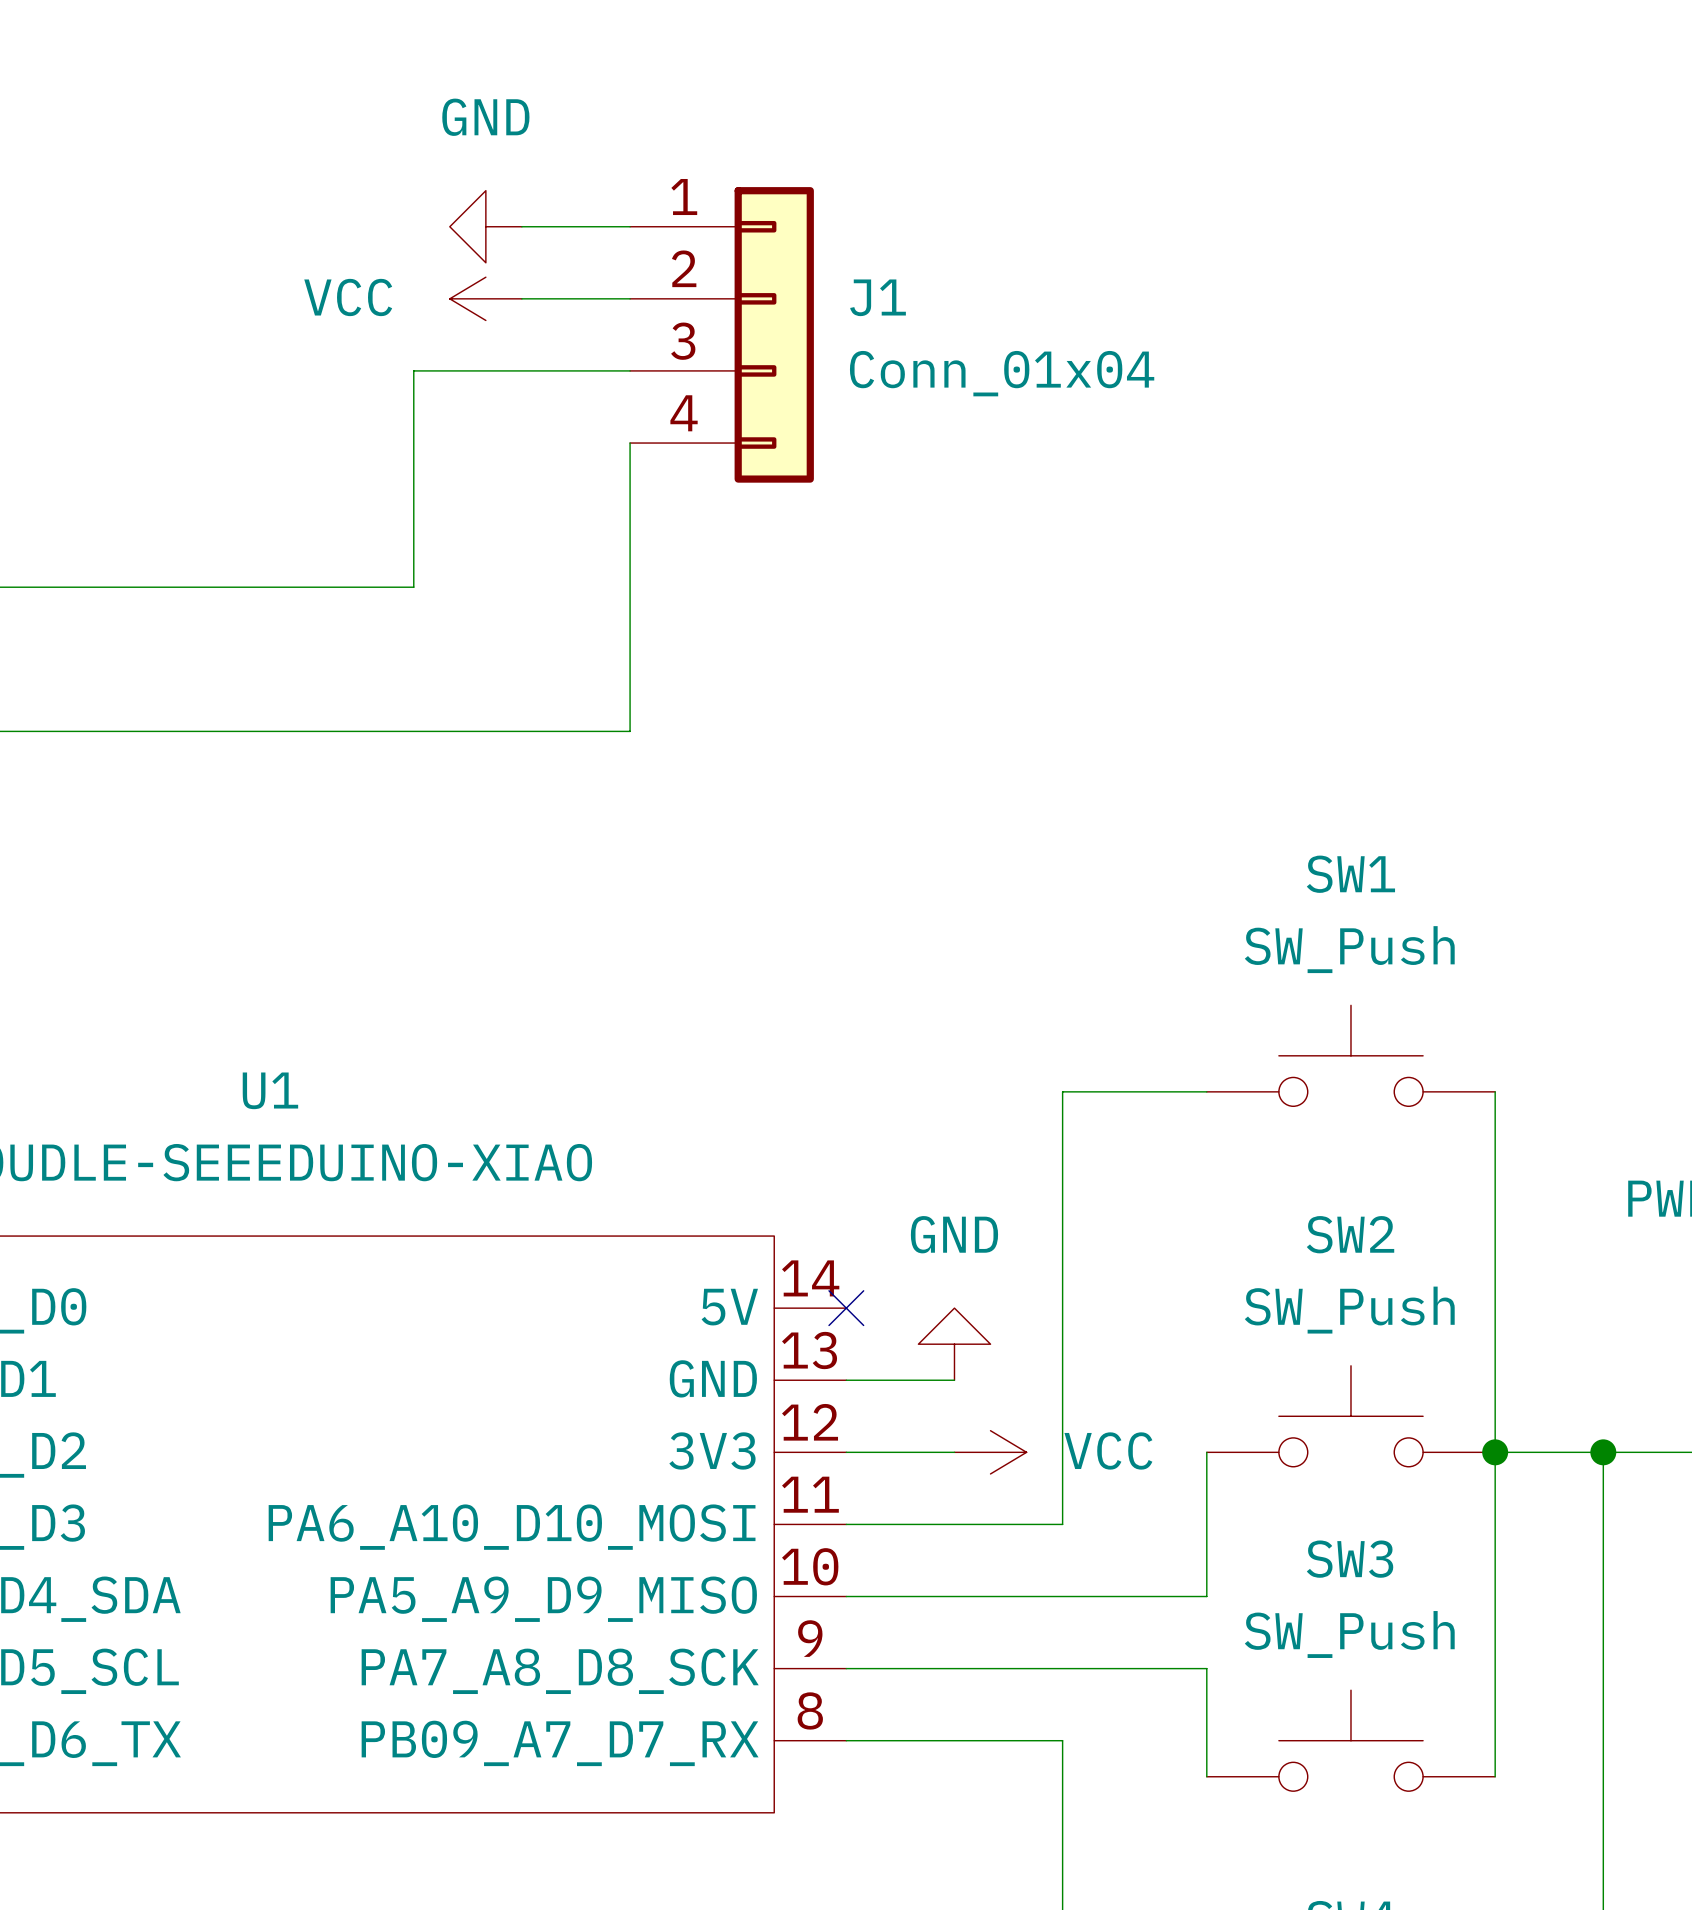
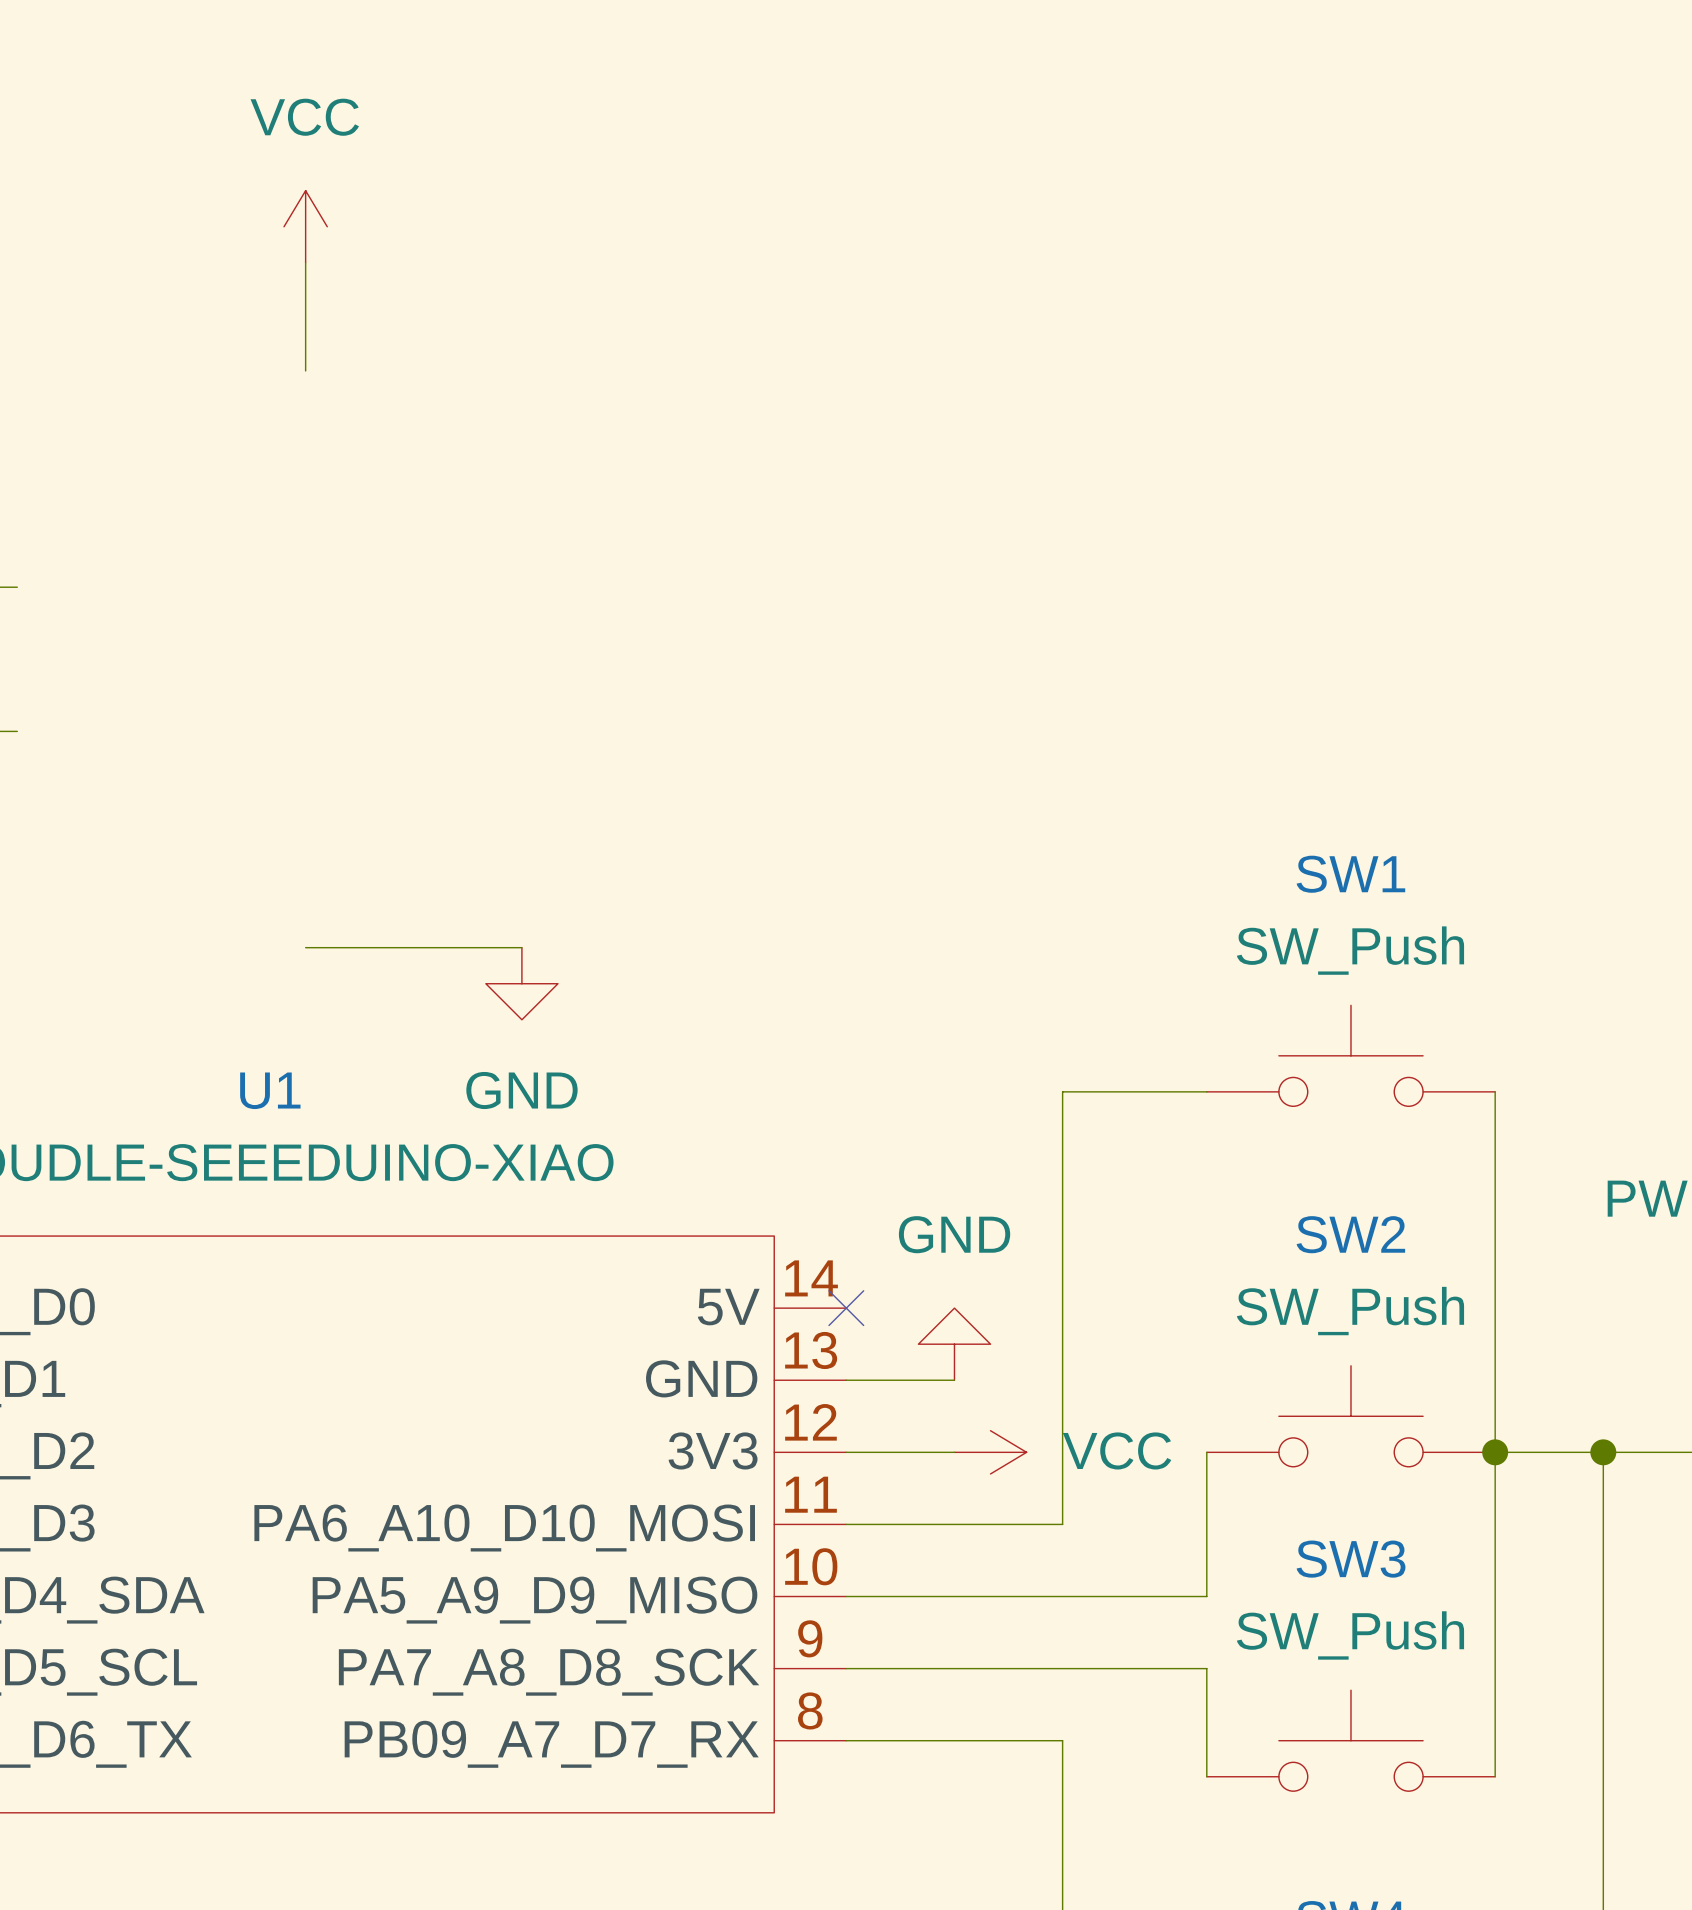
power symbol: GND (485, 226) -> none
wire: (521, 226) (630, 226) -> none
wire: none -> (305, 262) (305, 370)
power symbol rotation: 0° (485, 298) -> 90° clockwise (305, 226)
power symbol position: VCC (485, 298) -> VCC (305, 226)
wire: (521, 298) (630, 298) -> none
J1: Conn_01x04 (721, 334) -> none
wire: (630, 370) (413, 370) (413, 587) (17, 587) -> none
wire: (630, 443) (630, 731) (17, 731) -> none
wire: none -> (305, 947) (521, 947)
power symbol: none -> GND (521, 983)

